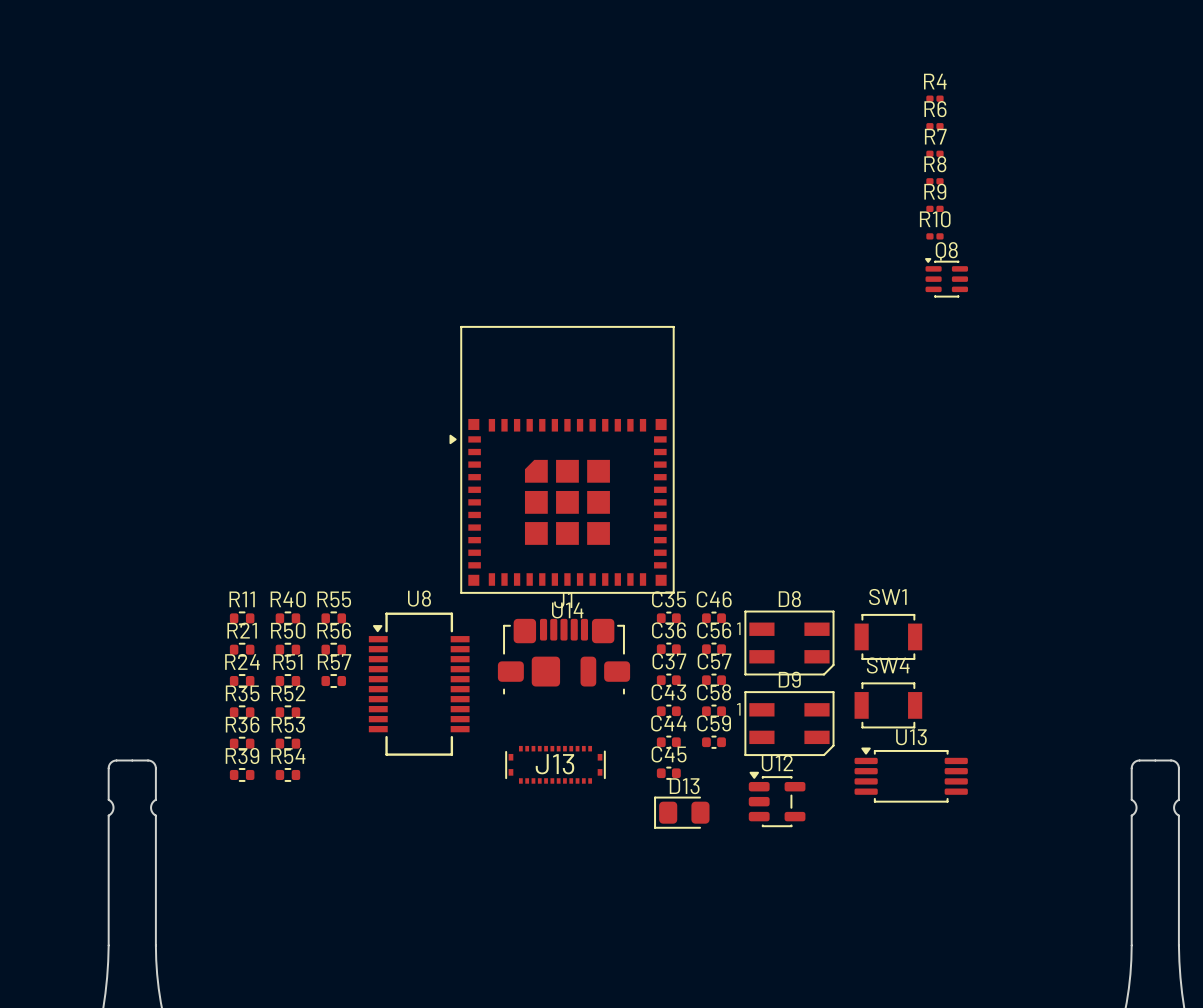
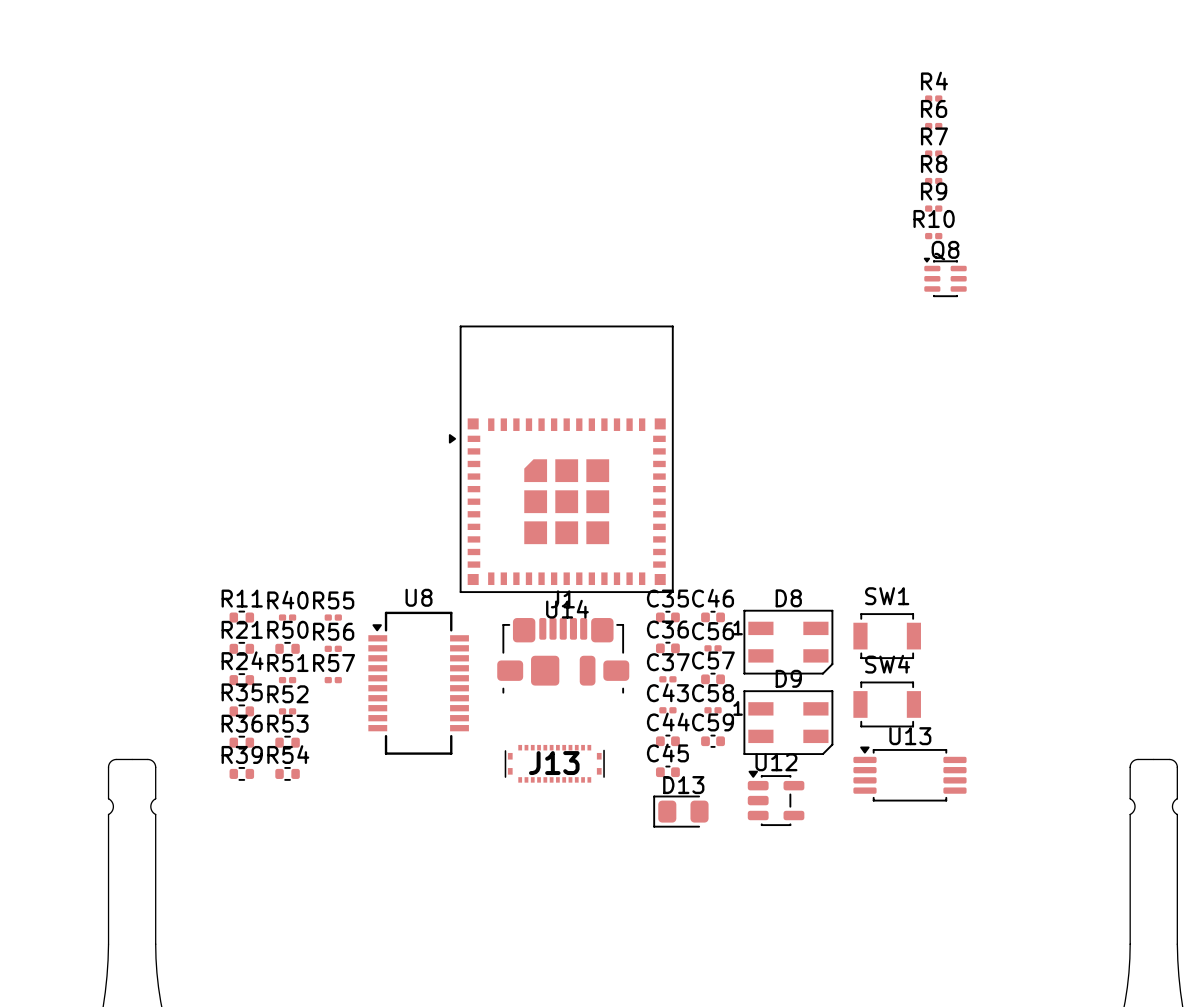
R40 footprint: [275, 611, 301, 626] -> [278, 614, 297, 621]
R55 footprint: [321, 611, 347, 626] -> [324, 614, 342, 621]
R56 footprint: [321, 642, 347, 657] -> [324, 645, 342, 652]
C56 footprint: [702, 642, 726, 656] -> [704, 645, 722, 652]
C37 footprint: [656, 673, 681, 687] -> [659, 676, 677, 683]
R51 footprint: [275, 674, 301, 688] -> [278, 676, 297, 684]
R57 footprint: [321, 674, 347, 688] -> [324, 676, 342, 684]
C43 footprint: [656, 704, 681, 718] -> [659, 707, 677, 714]
C58 footprint: [702, 704, 726, 718] -> [704, 707, 722, 714]
R52 footprint: [275, 705, 301, 720] -> [278, 708, 297, 715]

